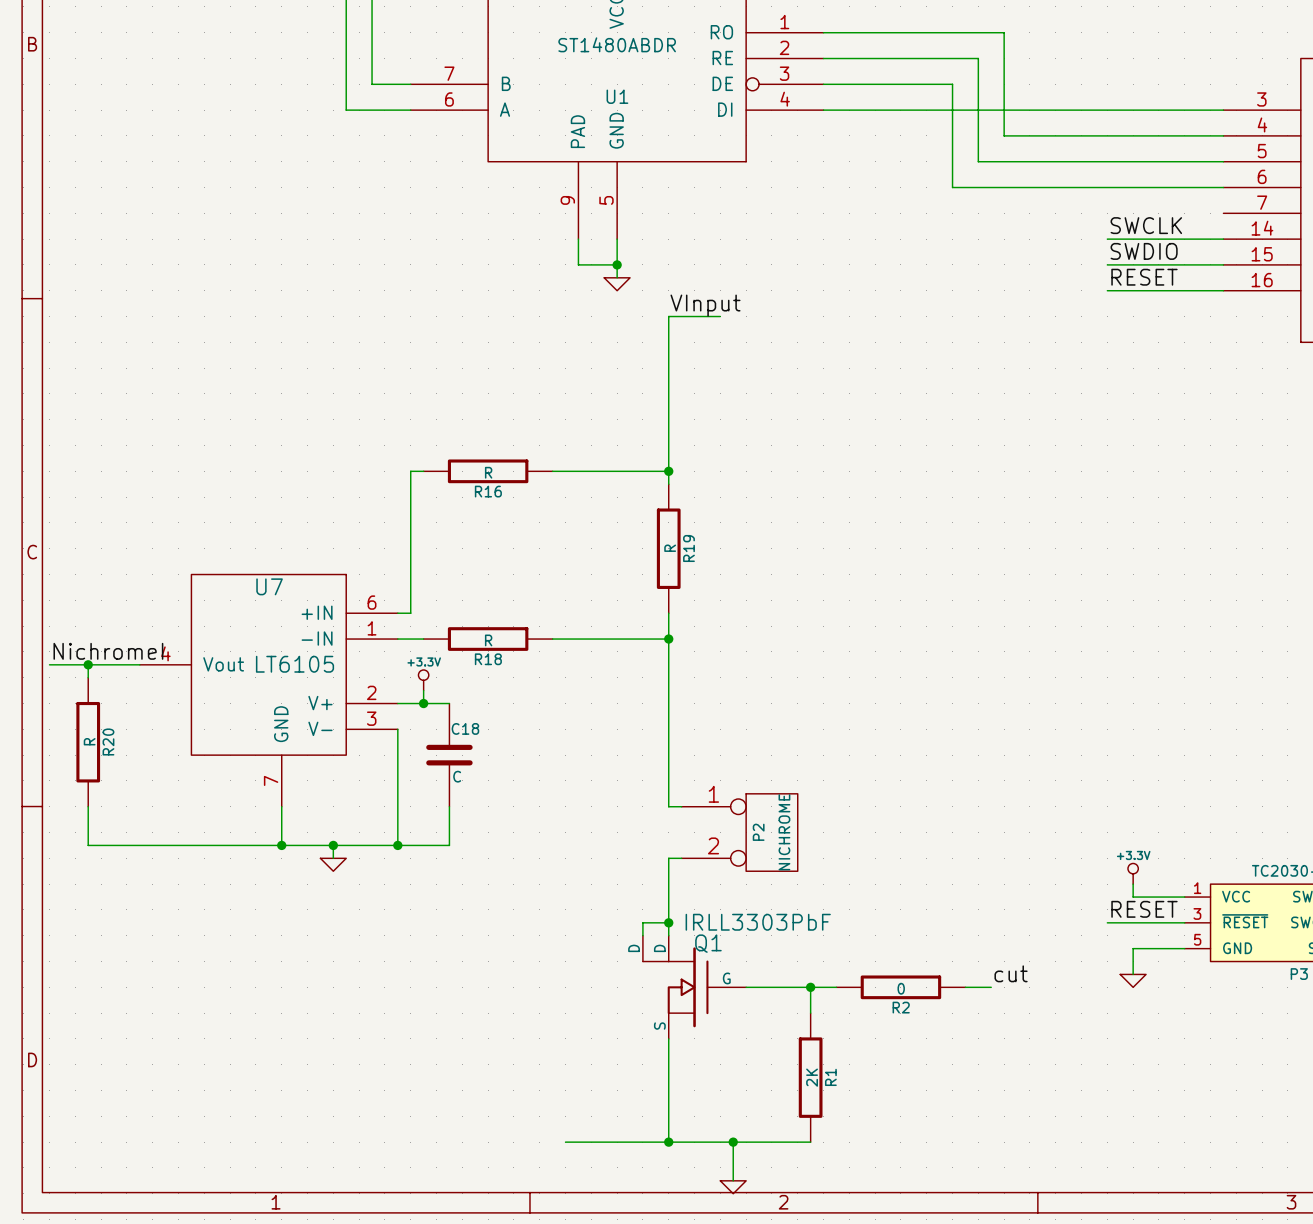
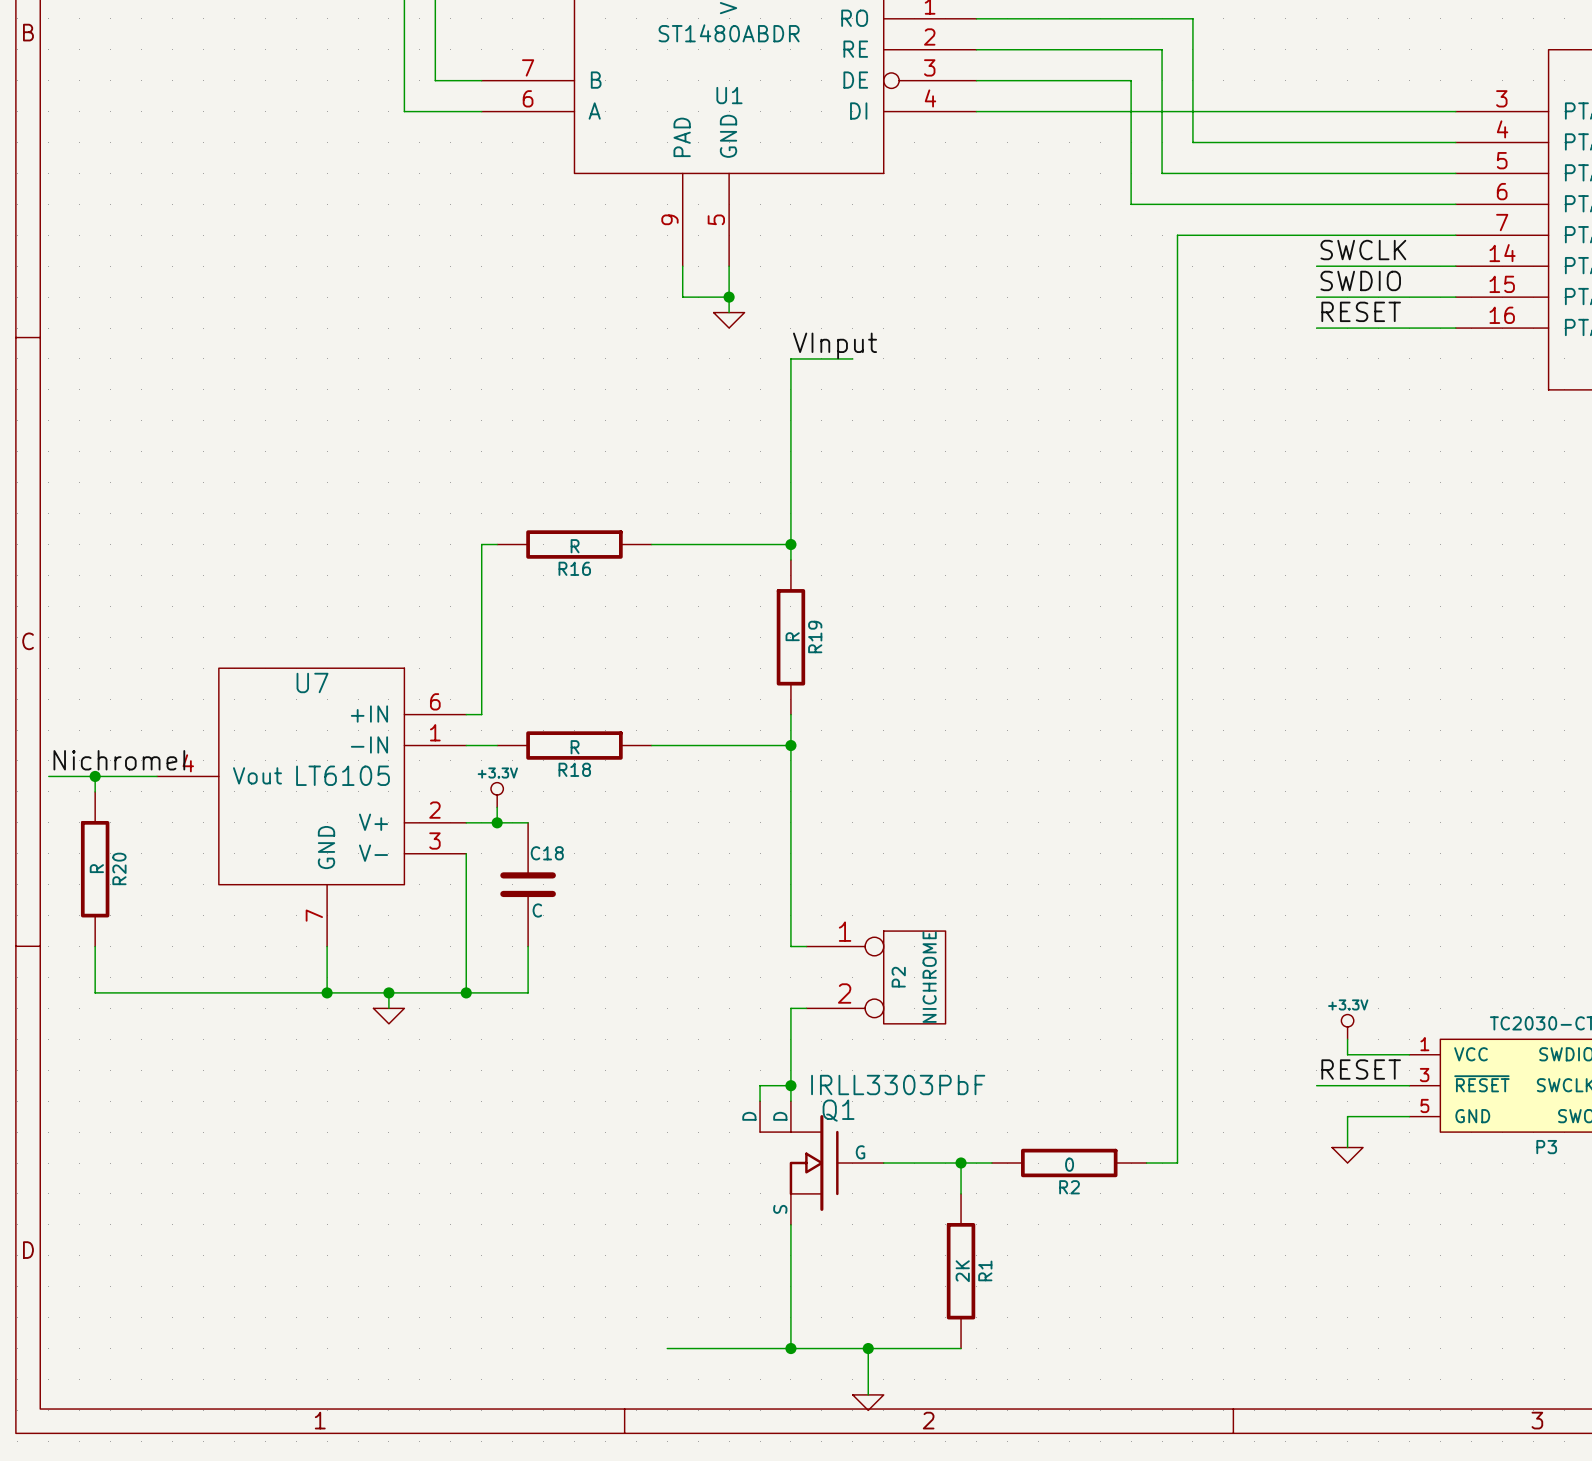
wire: none -> (1455, 235) (1177, 235) (1177, 1163)
label: cut (1011, 973) -> none

